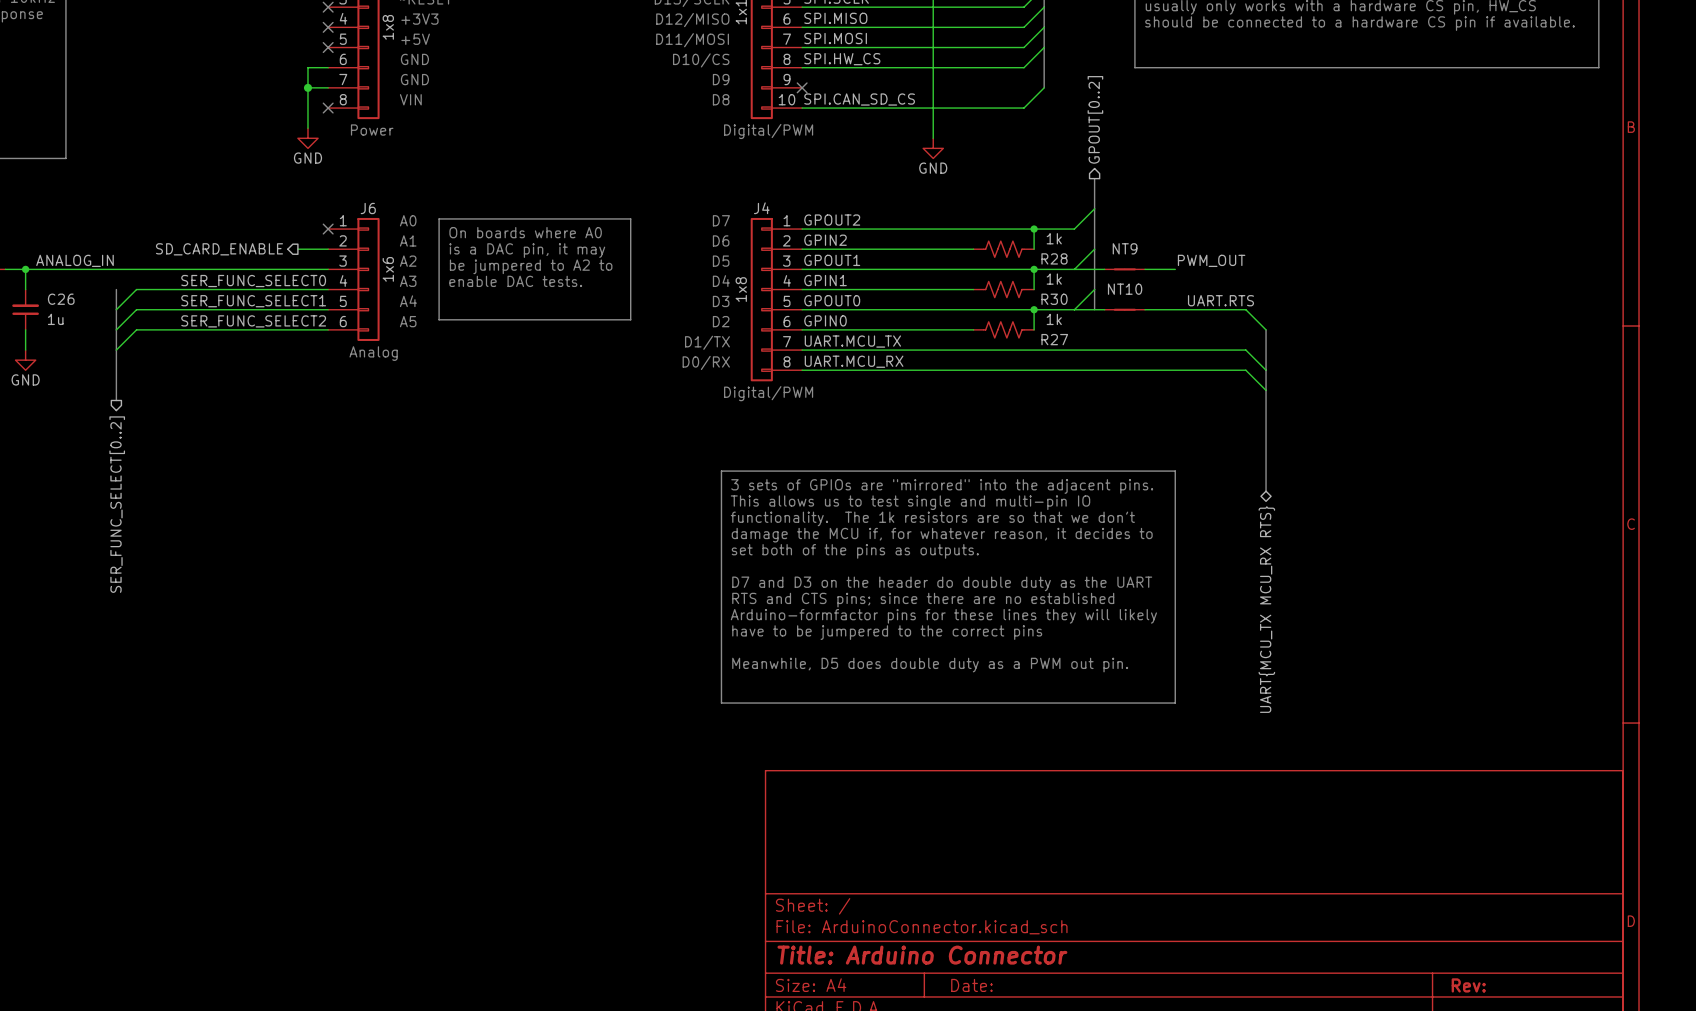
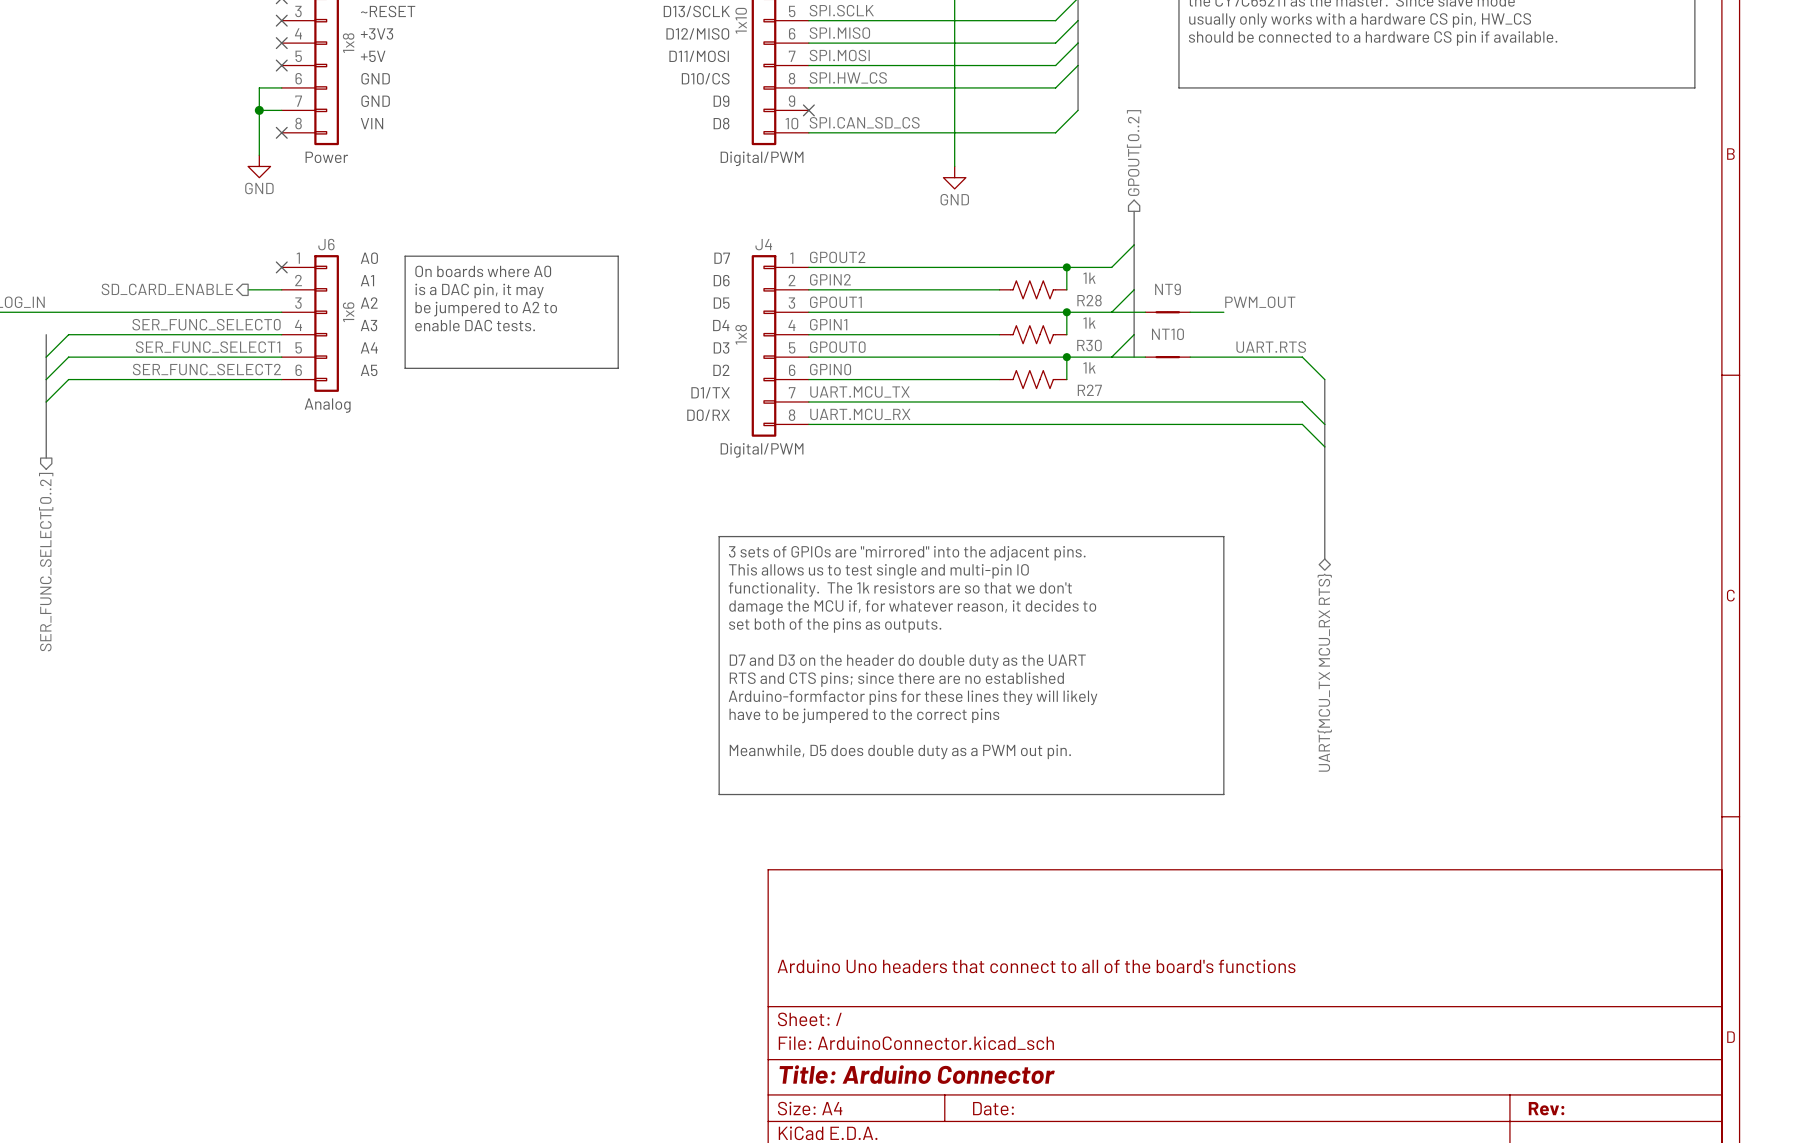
title block: none -> Arduino Uno headers that connect to all of the board's functions (1036, 966)

